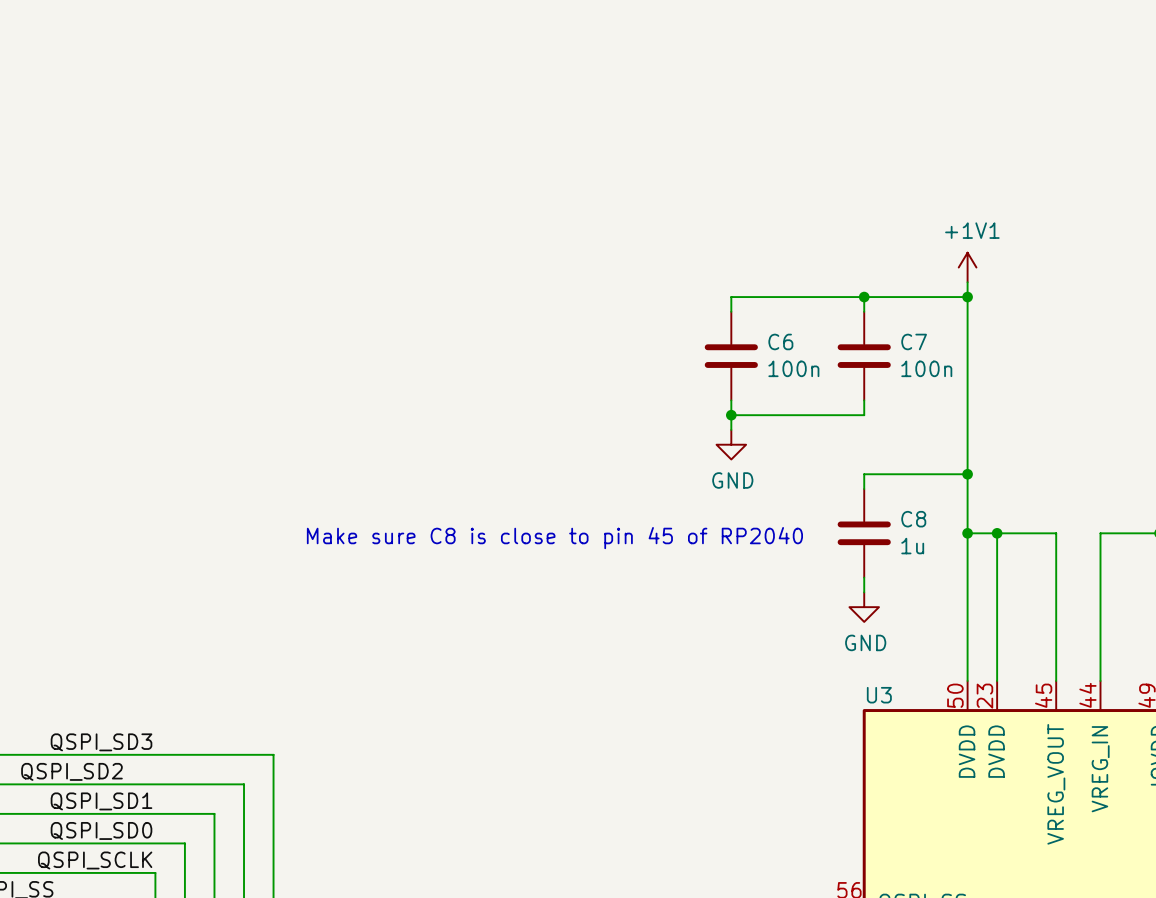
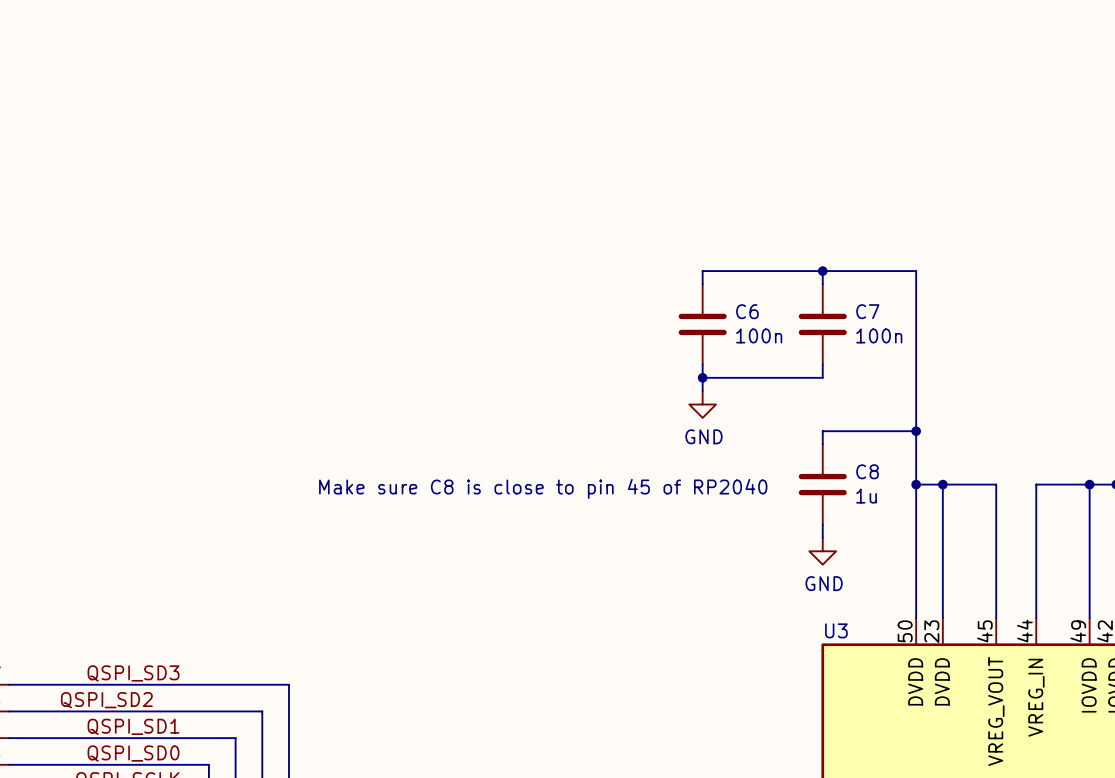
power symbol: +1V1 (967, 267) -> none
wire: (967, 282) (967, 297) -> none
junction: (967, 297) -> none

